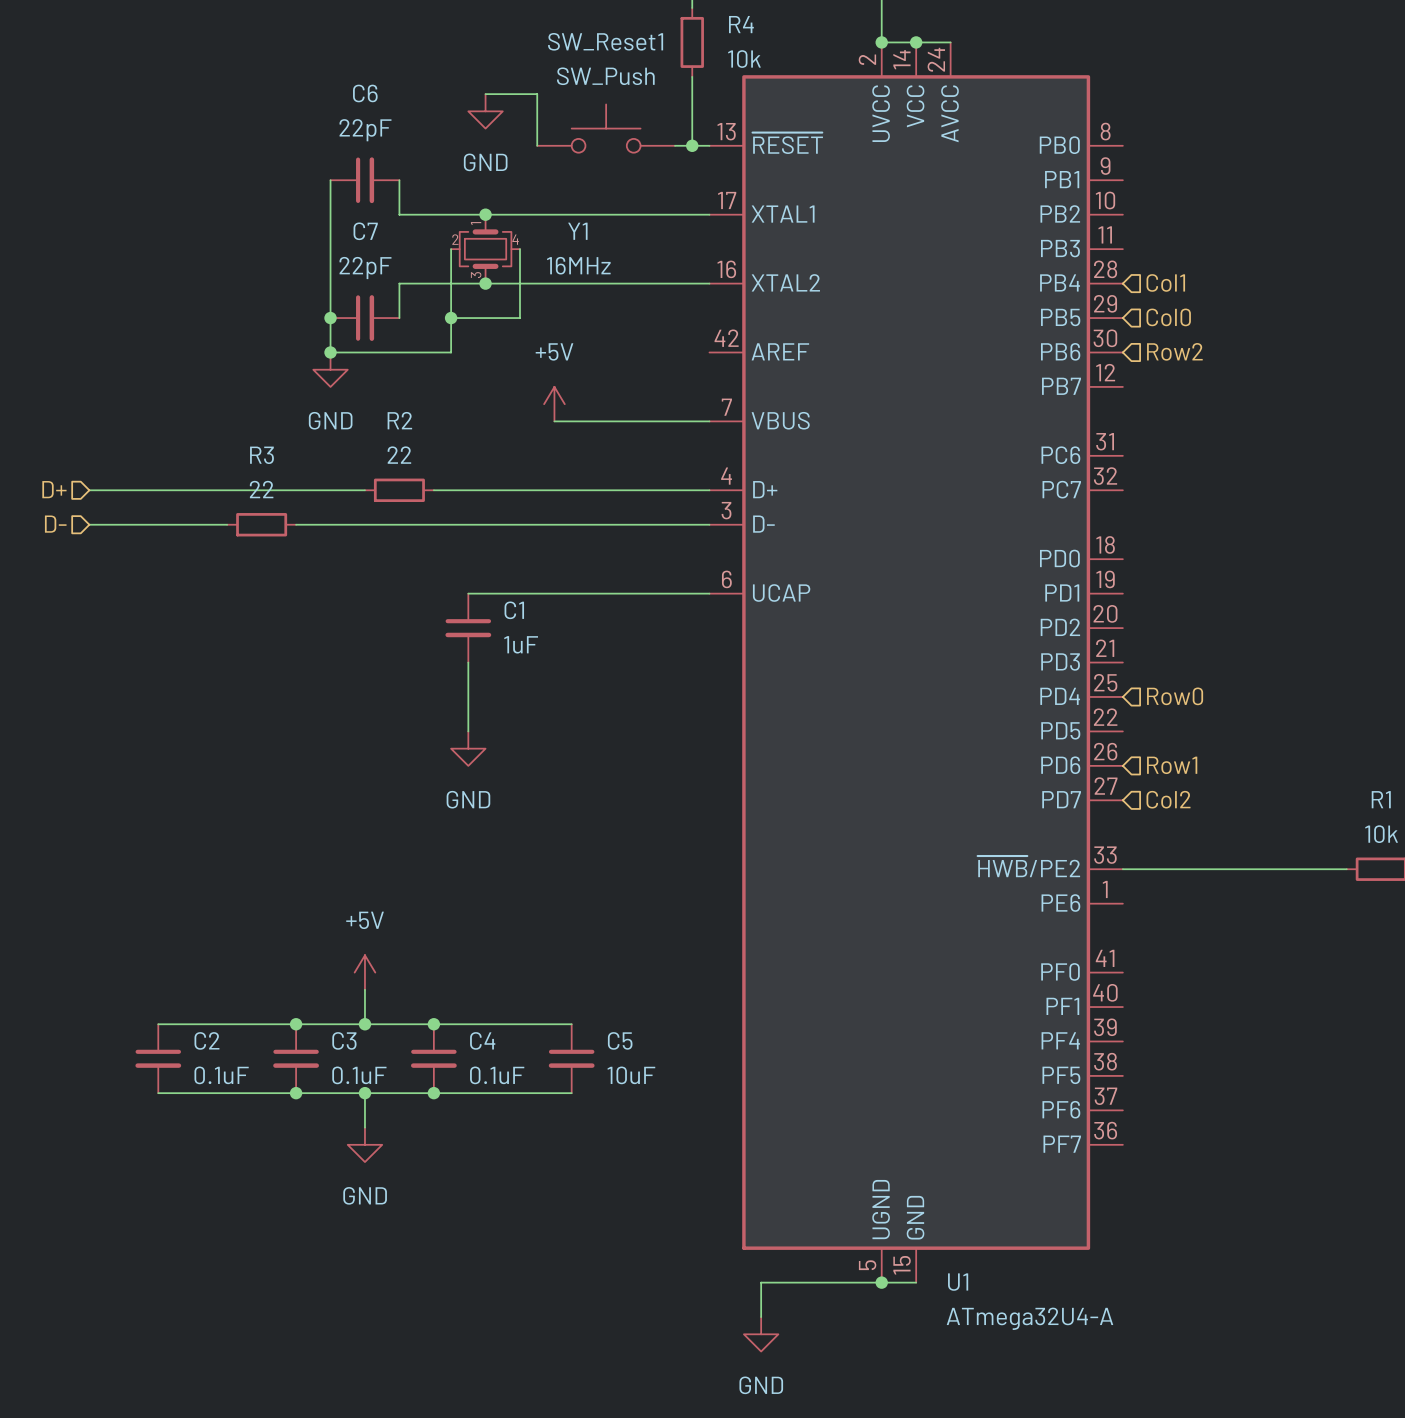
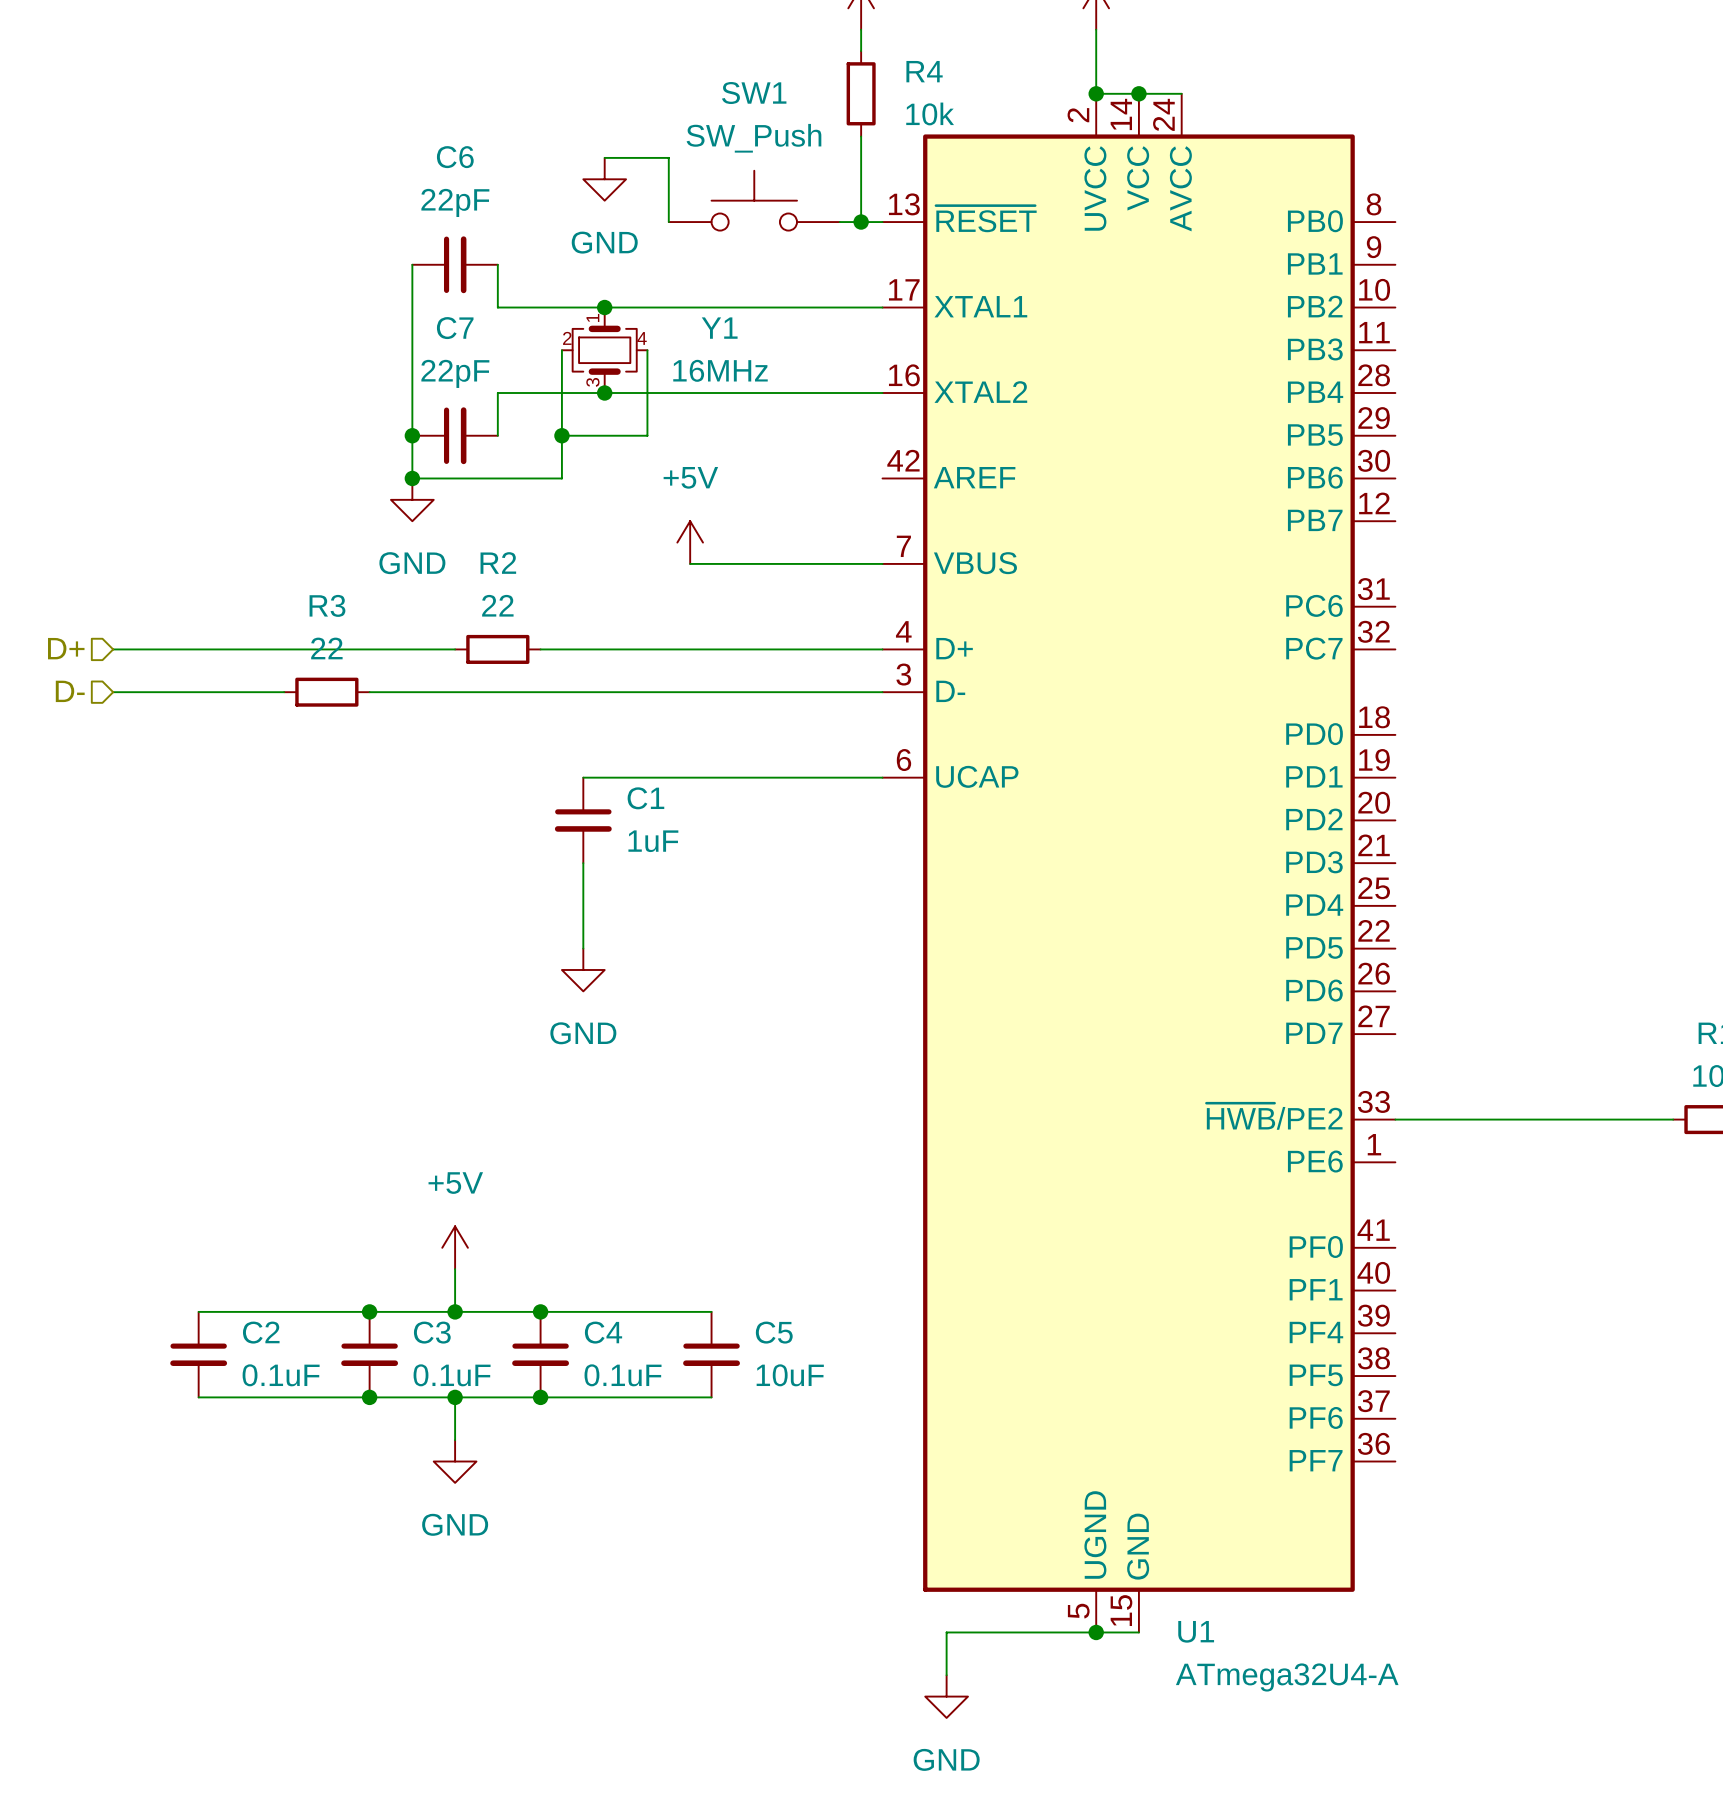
SW_Reset1 name: SW_Reset1 (605, 41) -> SW1 (754, 93)
hierarchical label: Col1 (1165, 282) -> none
hierarchical label: Col0 (1168, 317) -> none
hierarchical label: Row2 (1174, 351) -> none
hierarchical label: Row0 (1175, 696) -> none
hierarchical label: Row1 (1172, 765) -> none
hierarchical label: Col2 (1168, 799) -> none

